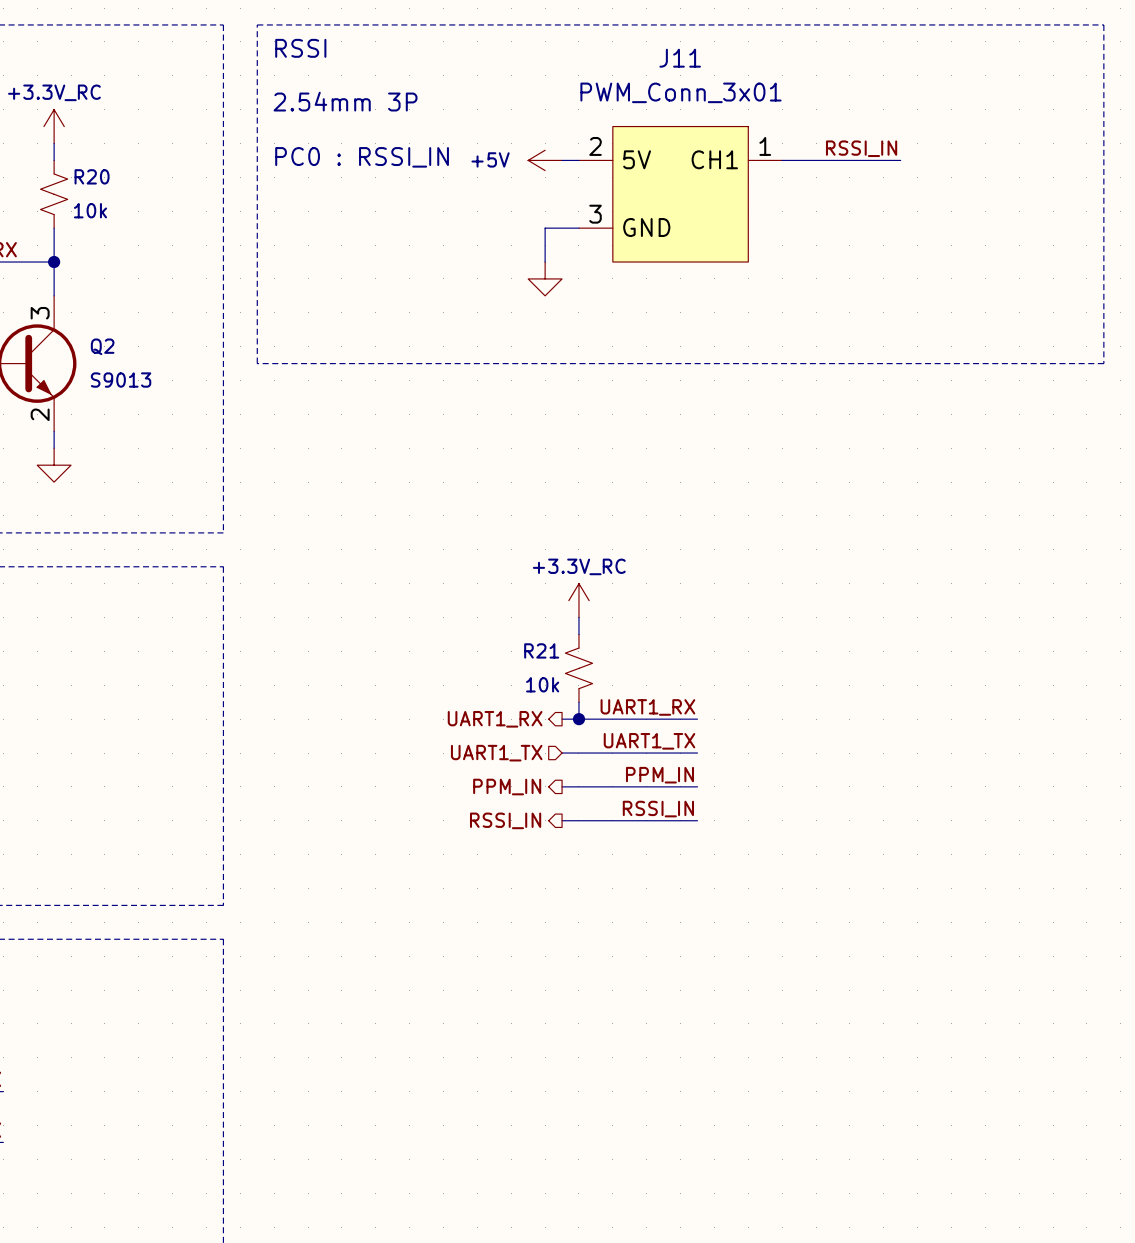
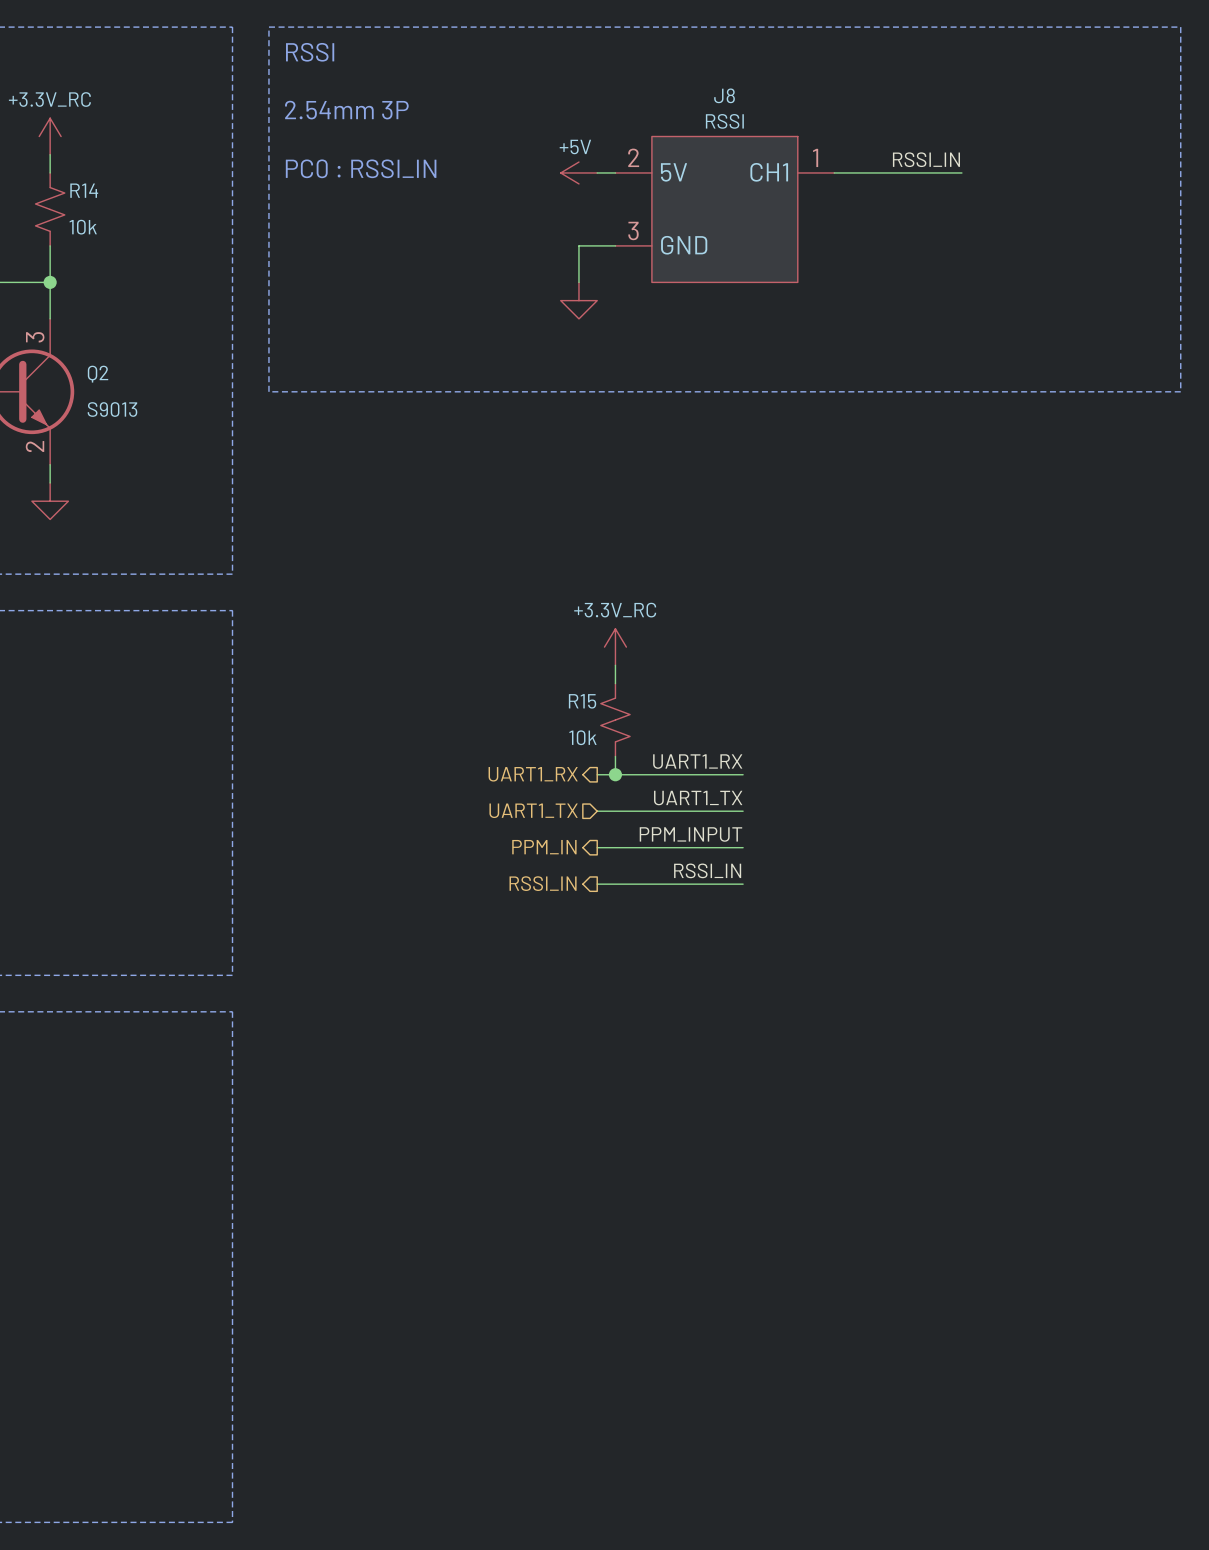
J11 name: J11 (680, 58) -> J8 (724, 95)
J11 value: PWM_Conn_3x01 (680, 92) -> RSSI (724, 121)
power symbol text position: +5V (490, 159) -> +5V (575, 146)
R20 name: R20 (92, 176) -> R14 (84, 190)
R21 name: R21 (541, 650) -> R15 (582, 701)
label: PPM_IN (659, 775) -> PPM_INPUT (690, 834)

